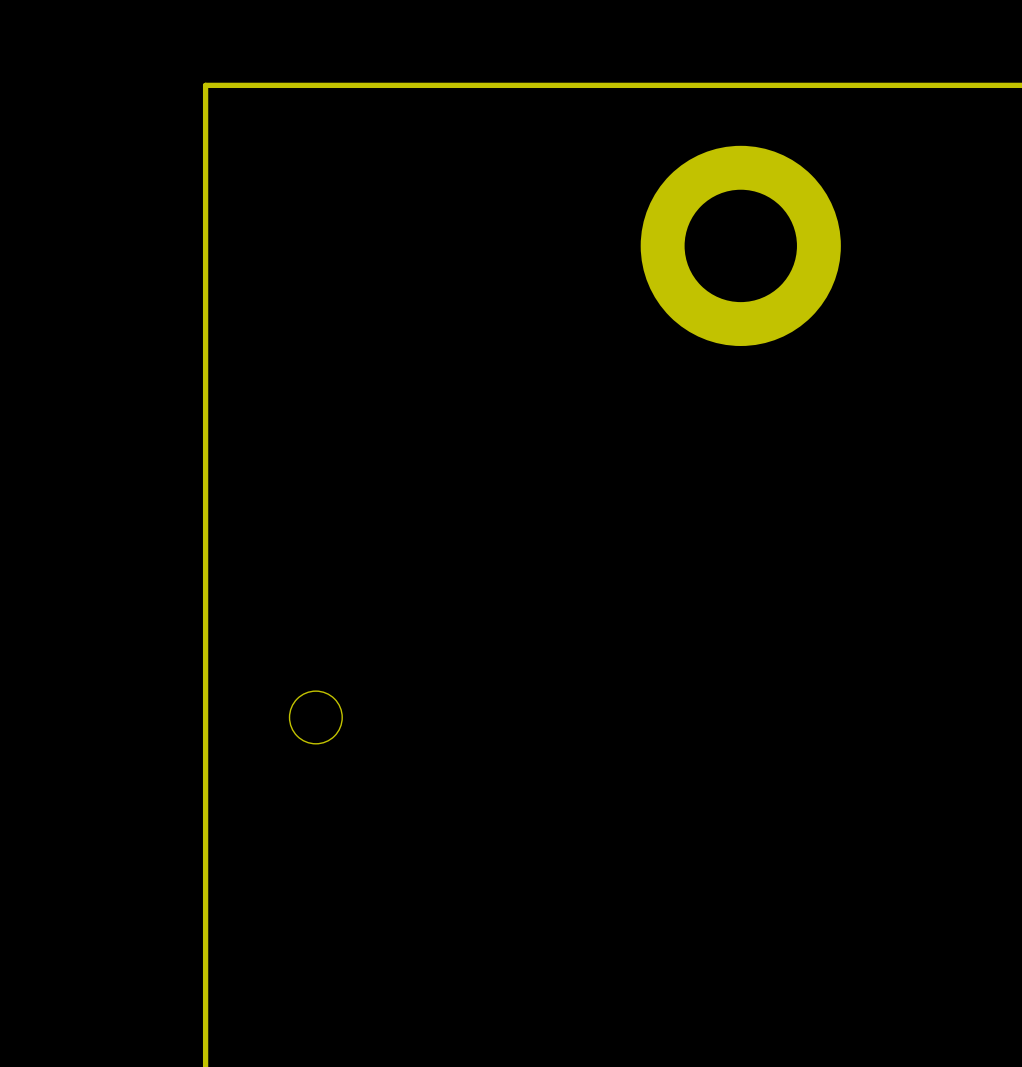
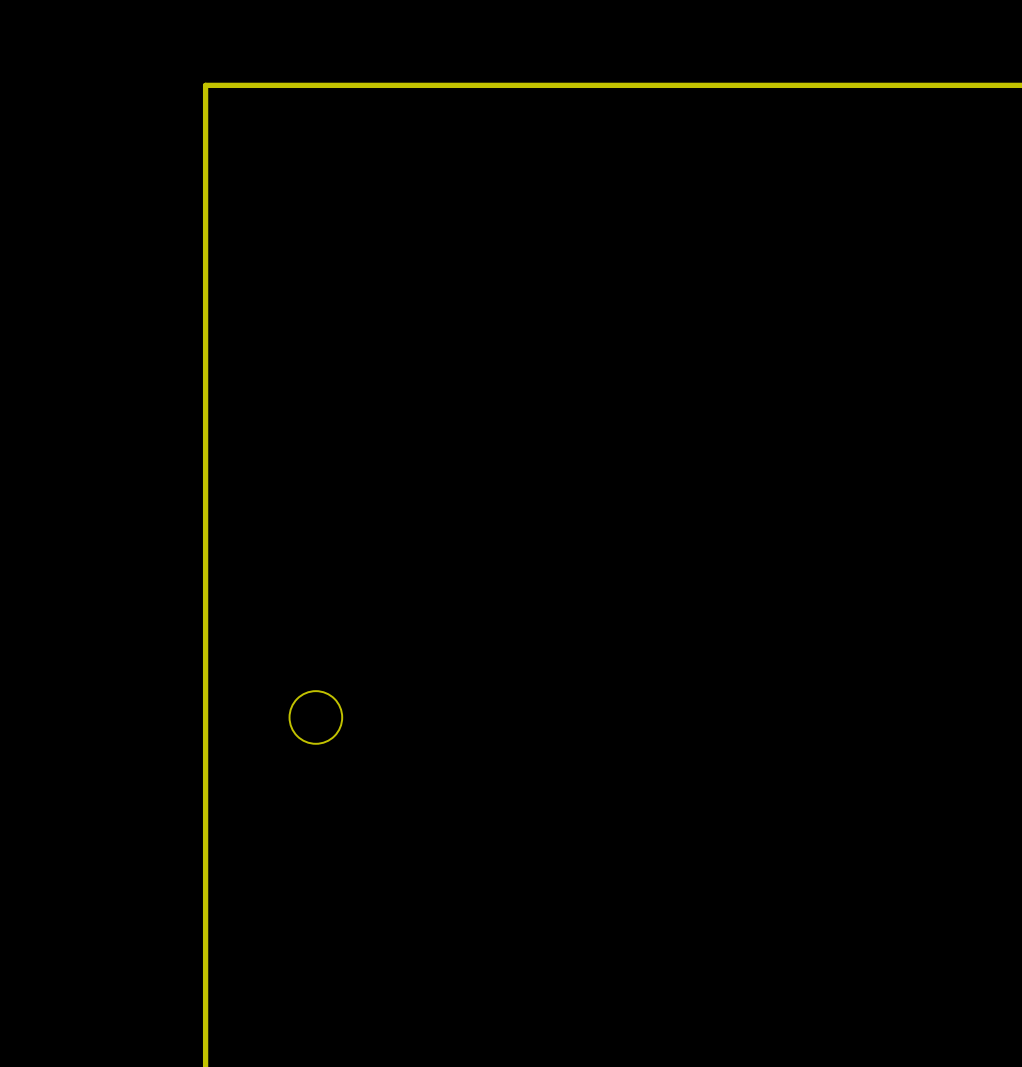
part: (740, 245) -> none

